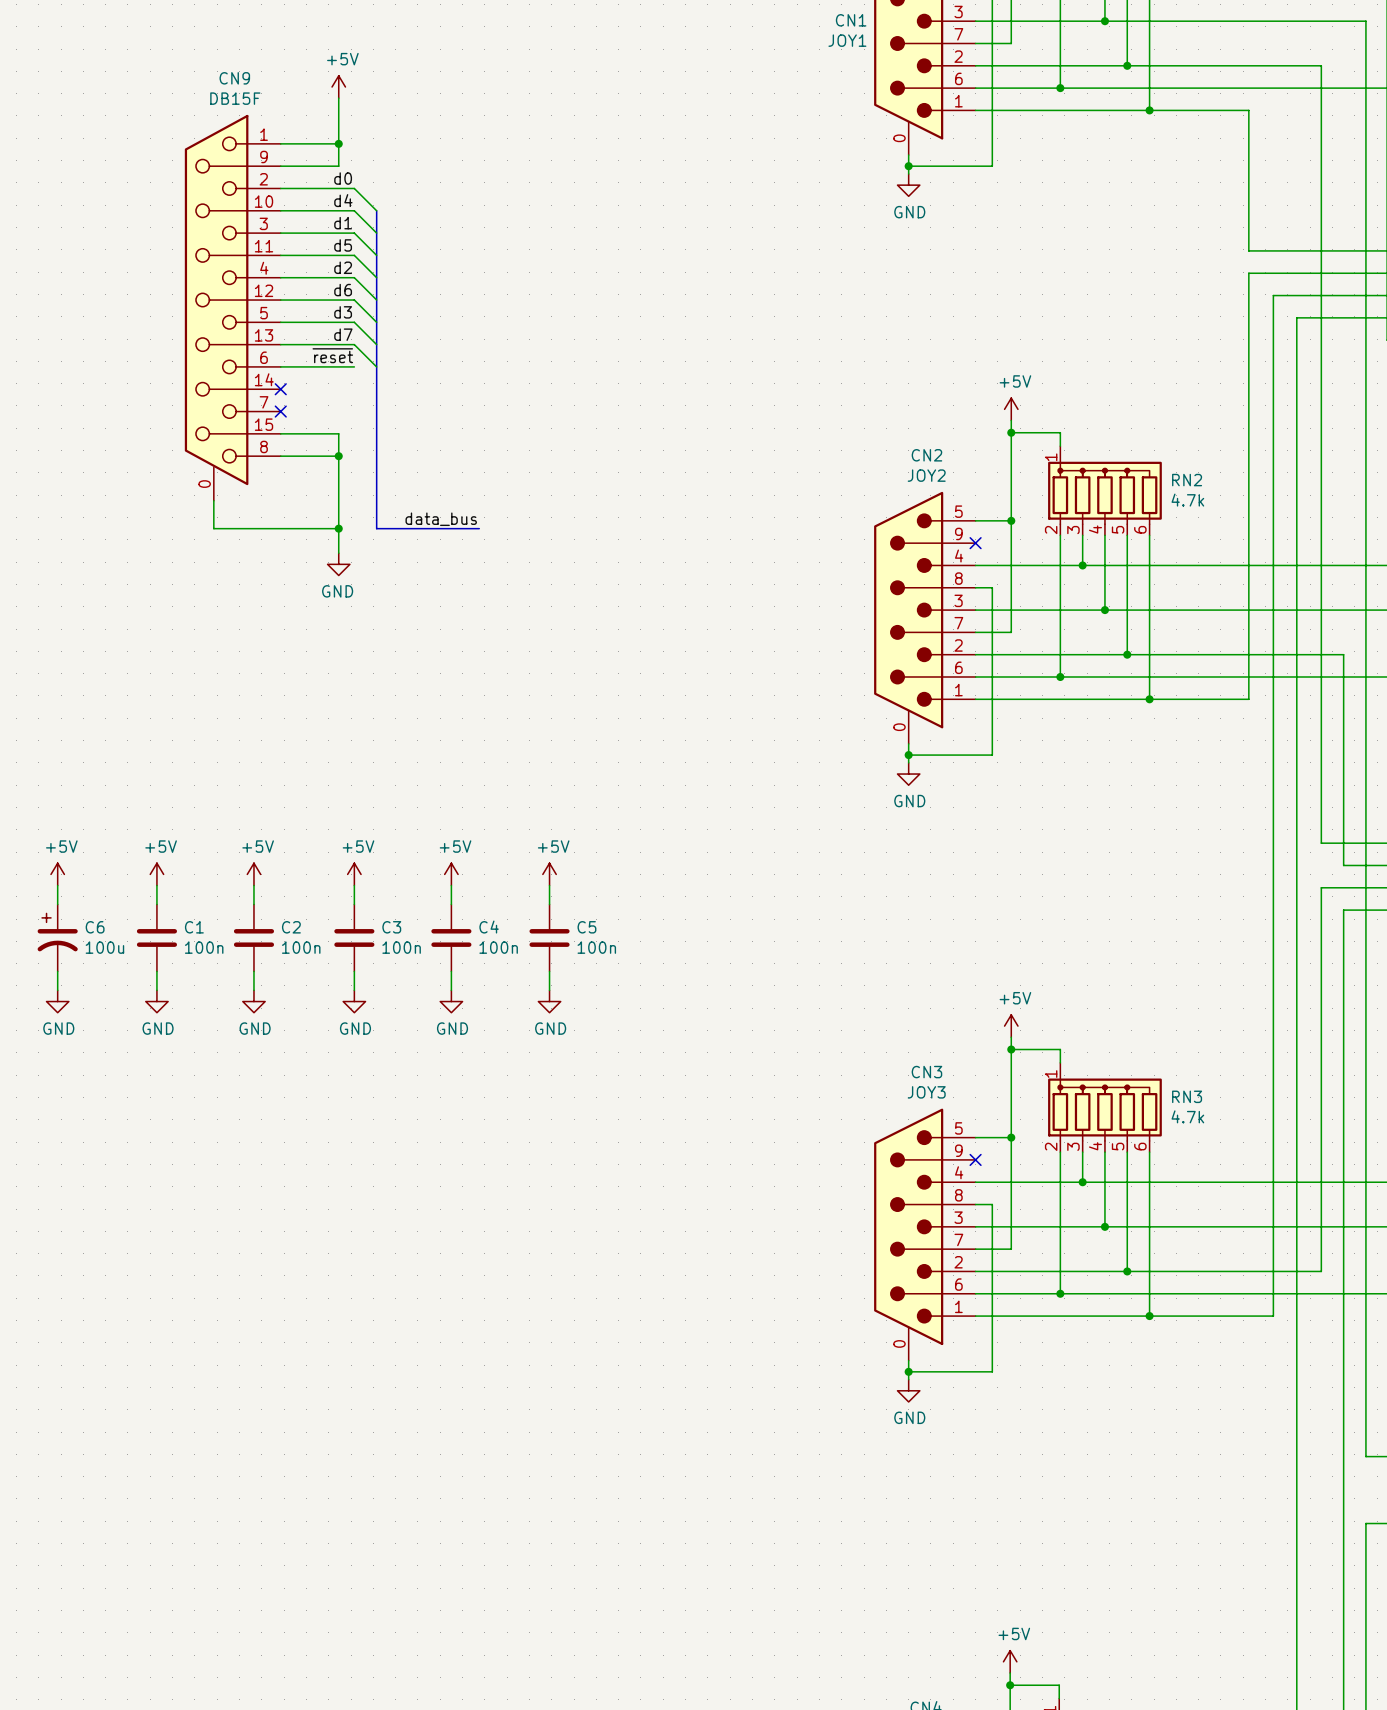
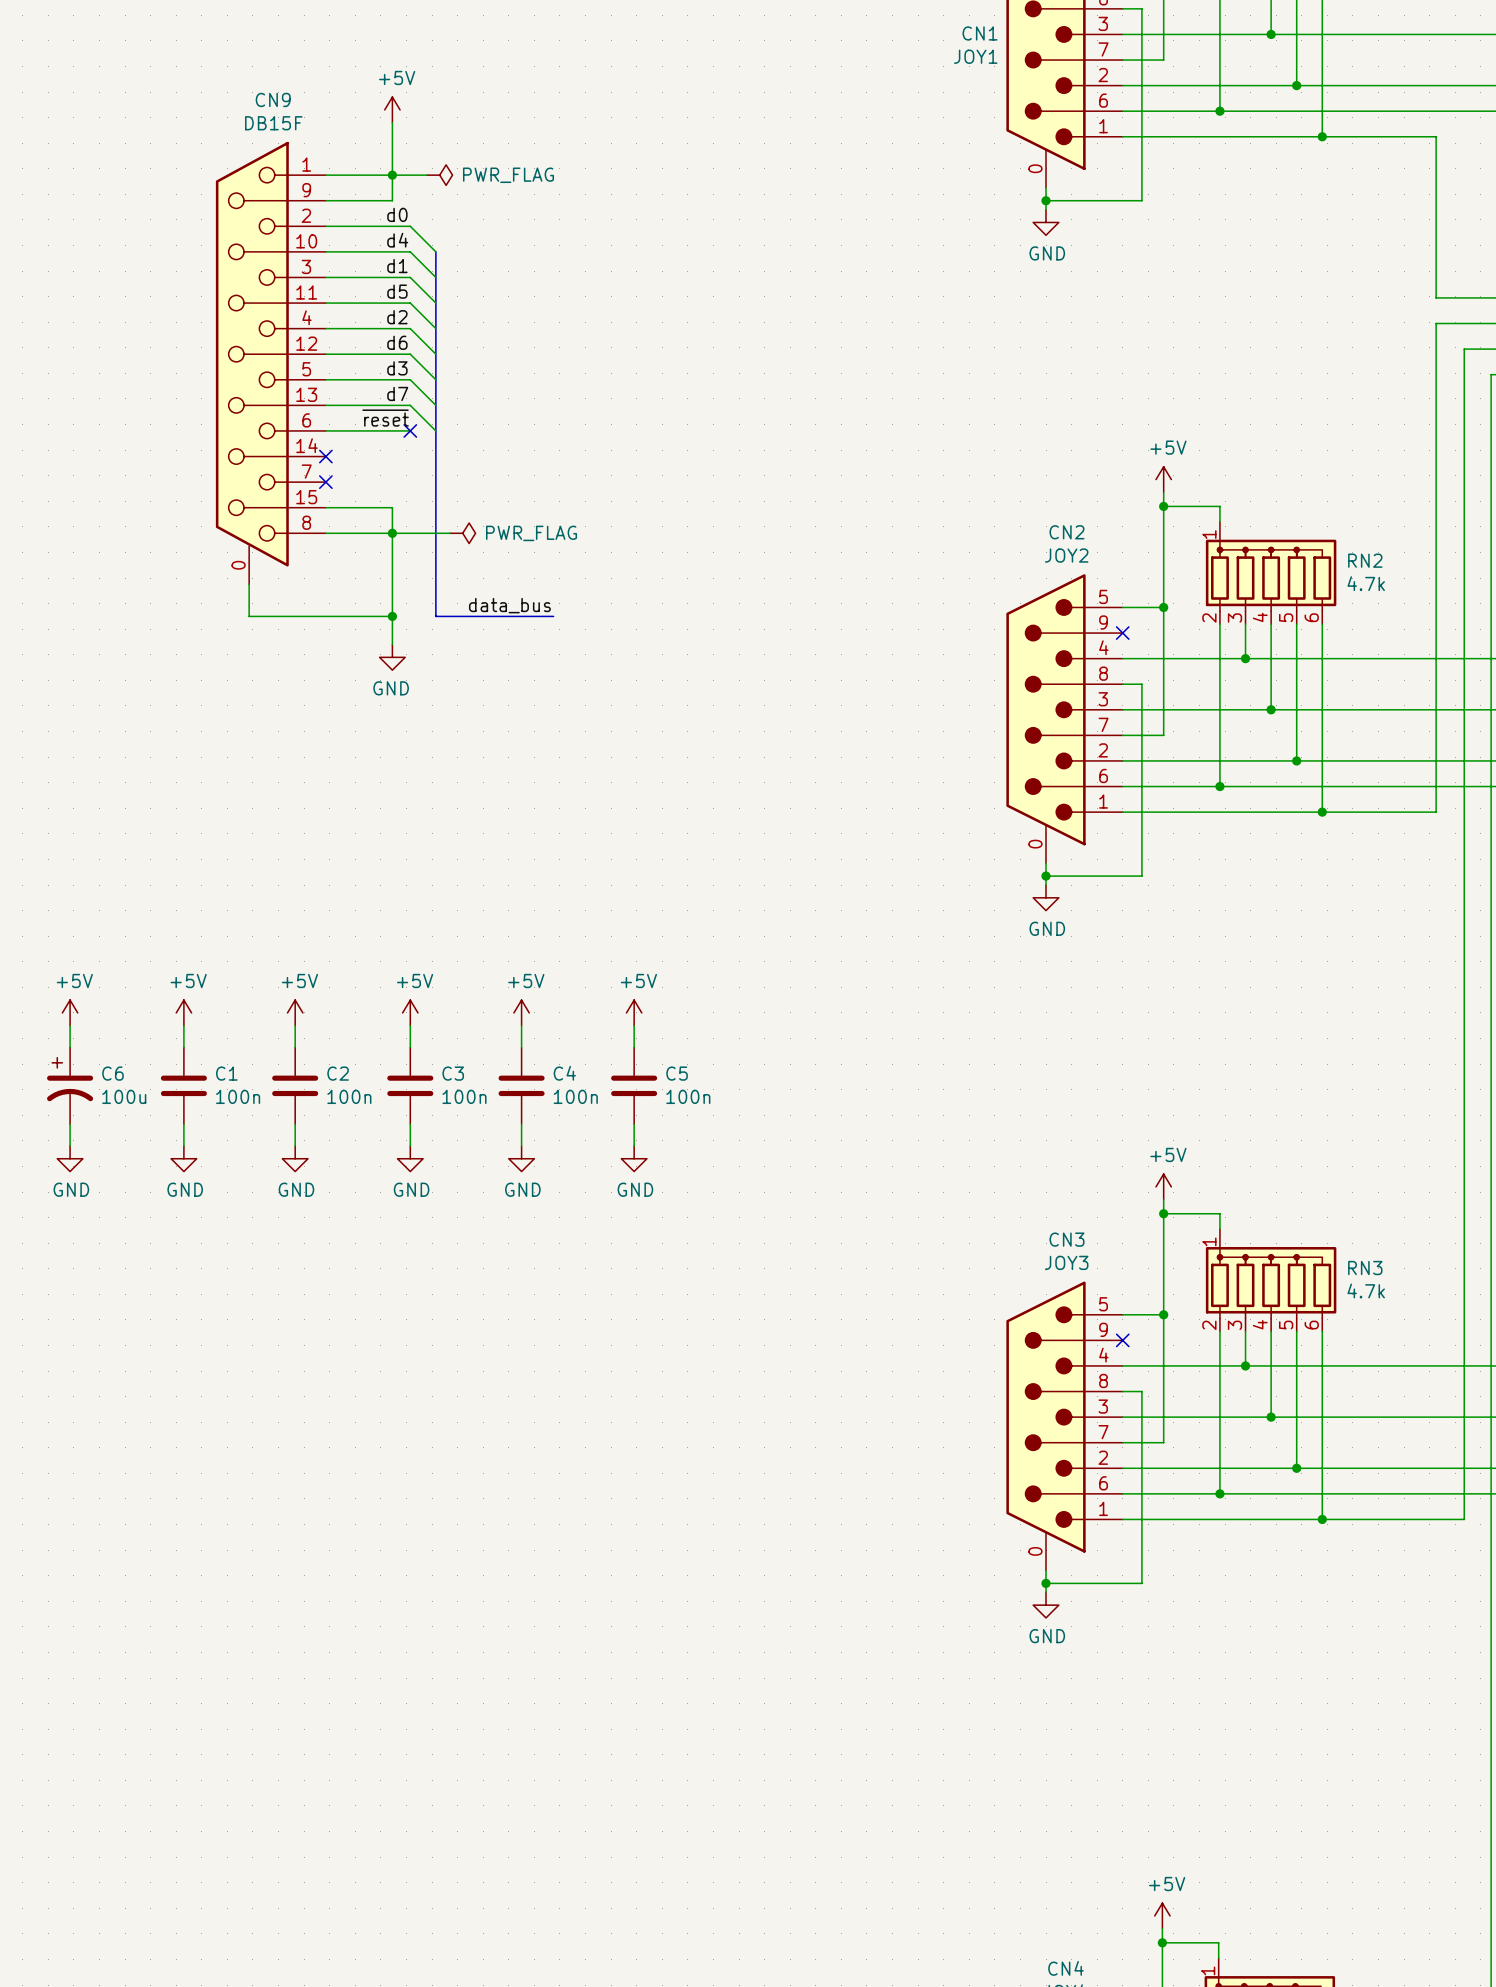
wire: none -> (392, 175) (426, 175)
power symbol: none -> PWR_FLAG (439, 175)
no-connect mark: none -> (410, 430)
wire: none -> (392, 533) (449, 533)
power symbol: none -> PWR_FLAG (462, 533)

